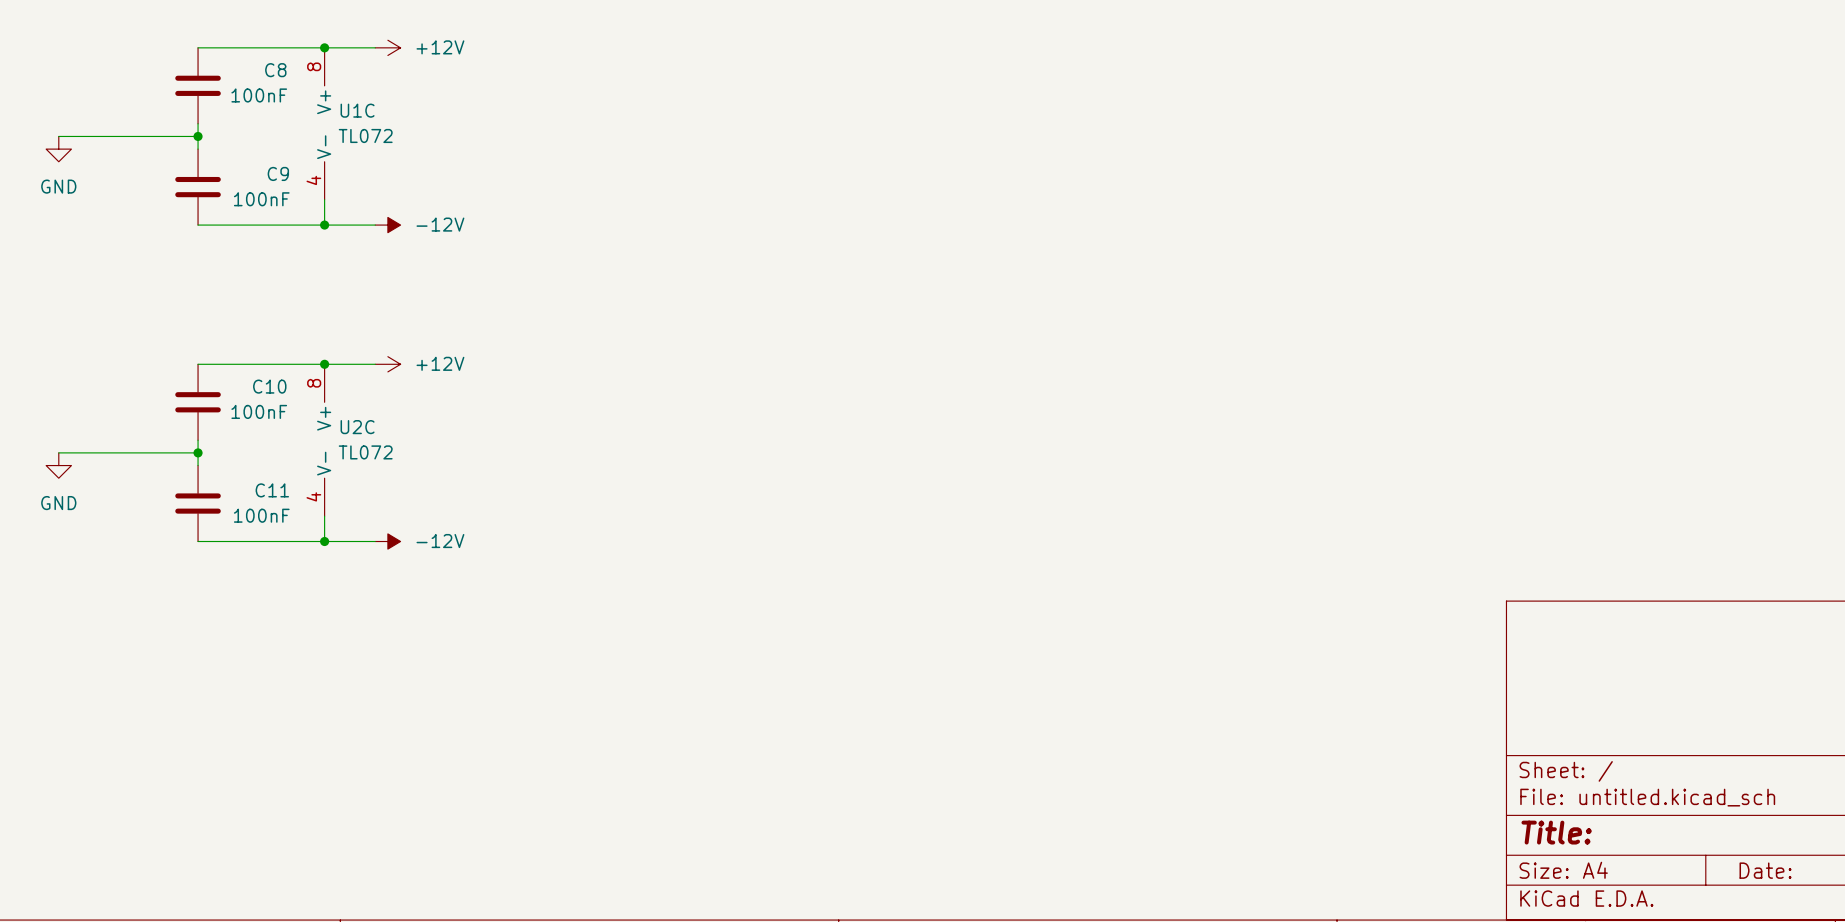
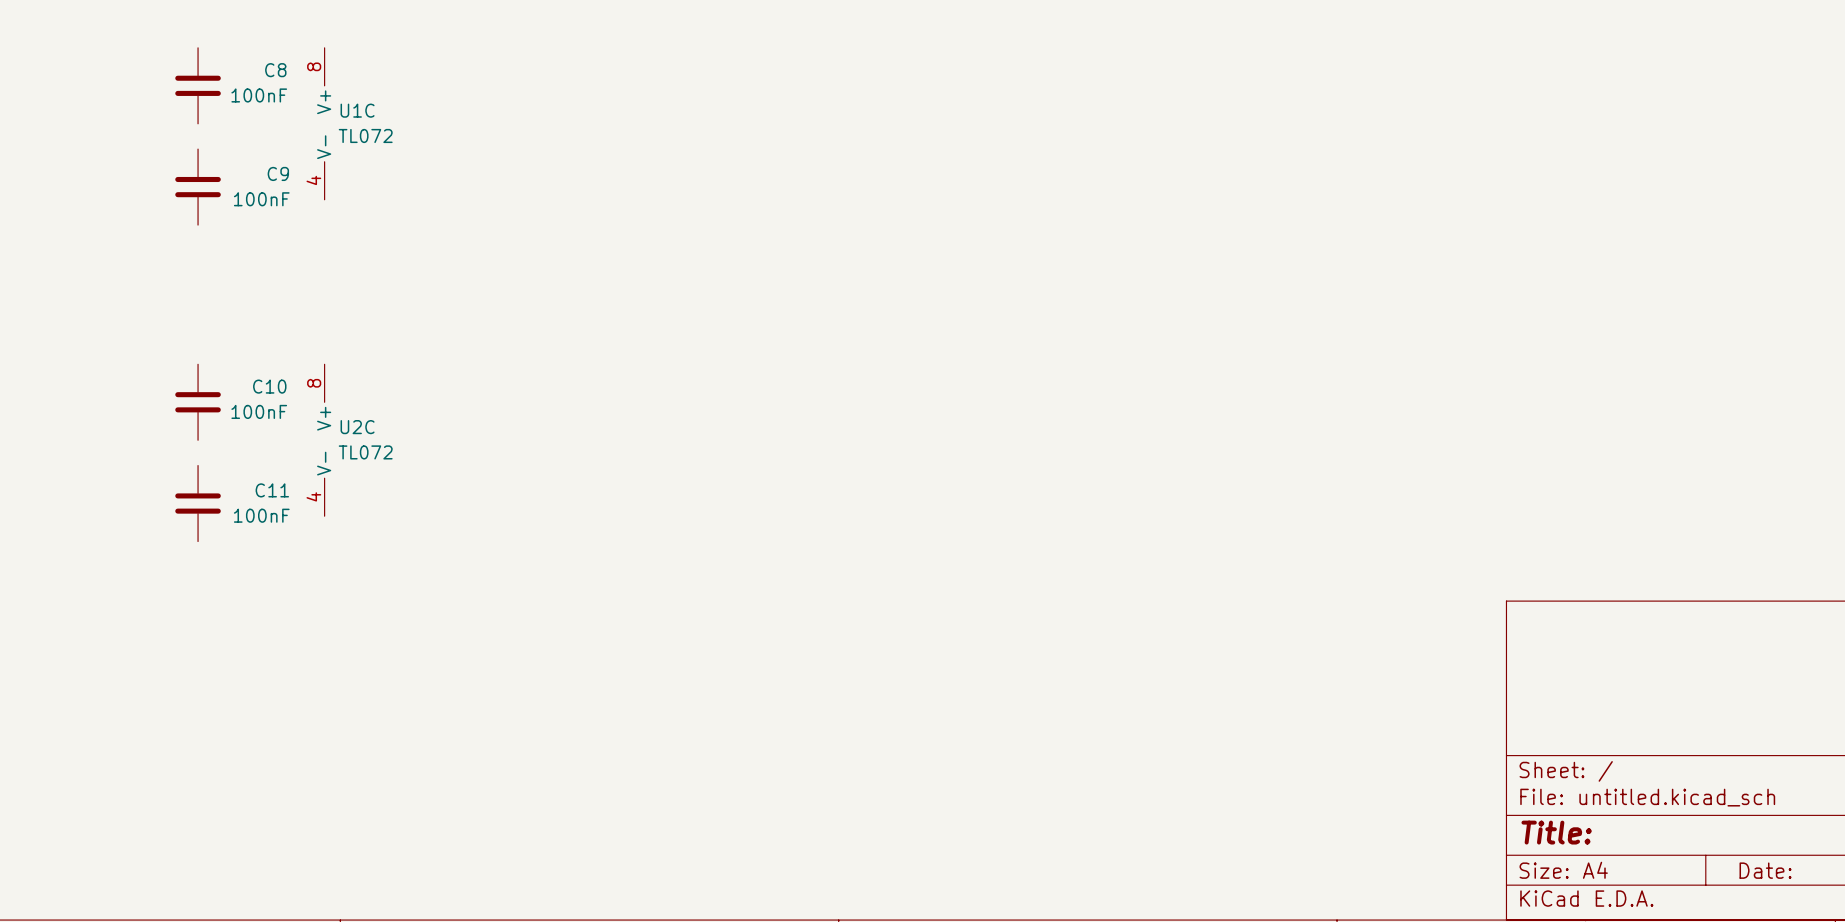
wire: (198, 47) (375, 47) -> none
junction: (324, 47) -> none
power symbol: +12V (387, 47) -> none
wire: (198, 123) (198, 149) -> none
wire: (58, 136) (198, 136) -> none
junction: (198, 136) -> none
power symbol: GND (58, 149) -> none
wire: (324, 199) (324, 225) -> none
wire: (198, 225) (375, 225) -> none
junction: (324, 225) -> none
power symbol: -12V (387, 225) -> none
wire: (198, 364) (375, 364) -> none
junction: (324, 364) -> none
power symbol: +12V (387, 364) -> none
wire: (198, 440) (198, 465) -> none
wire: (58, 452) (198, 452) -> none
junction: (198, 452) -> none
power symbol: GND (58, 465) -> none
wire: (324, 516) (324, 541) -> none
wire: (198, 541) (375, 541) -> none
junction: (324, 541) -> none
power symbol: -12V (387, 541) -> none

